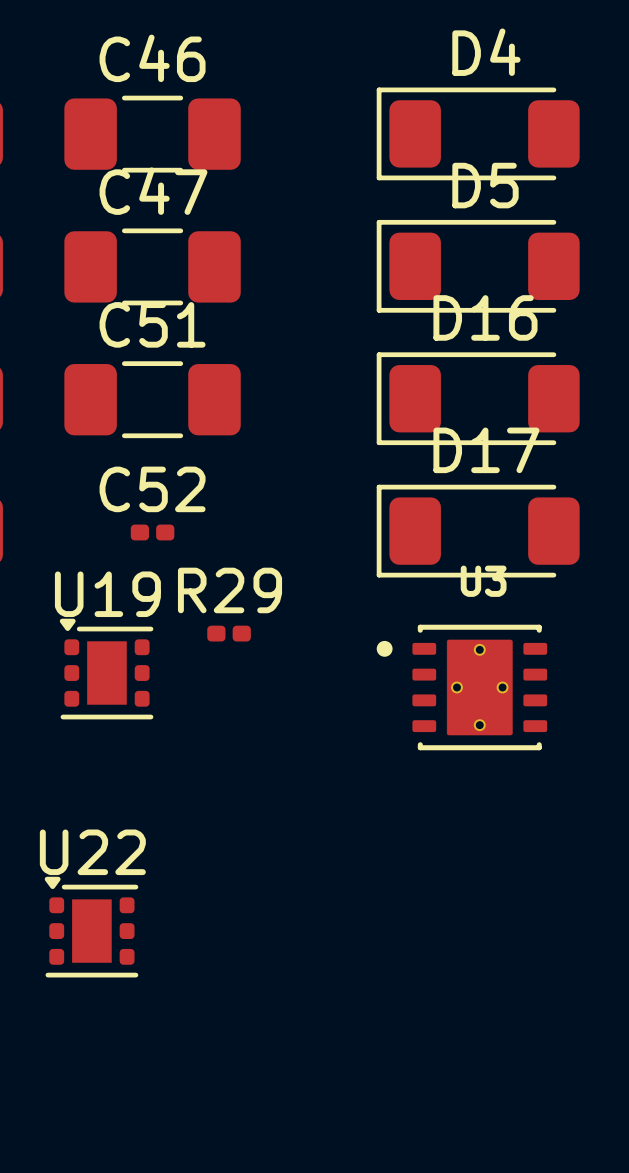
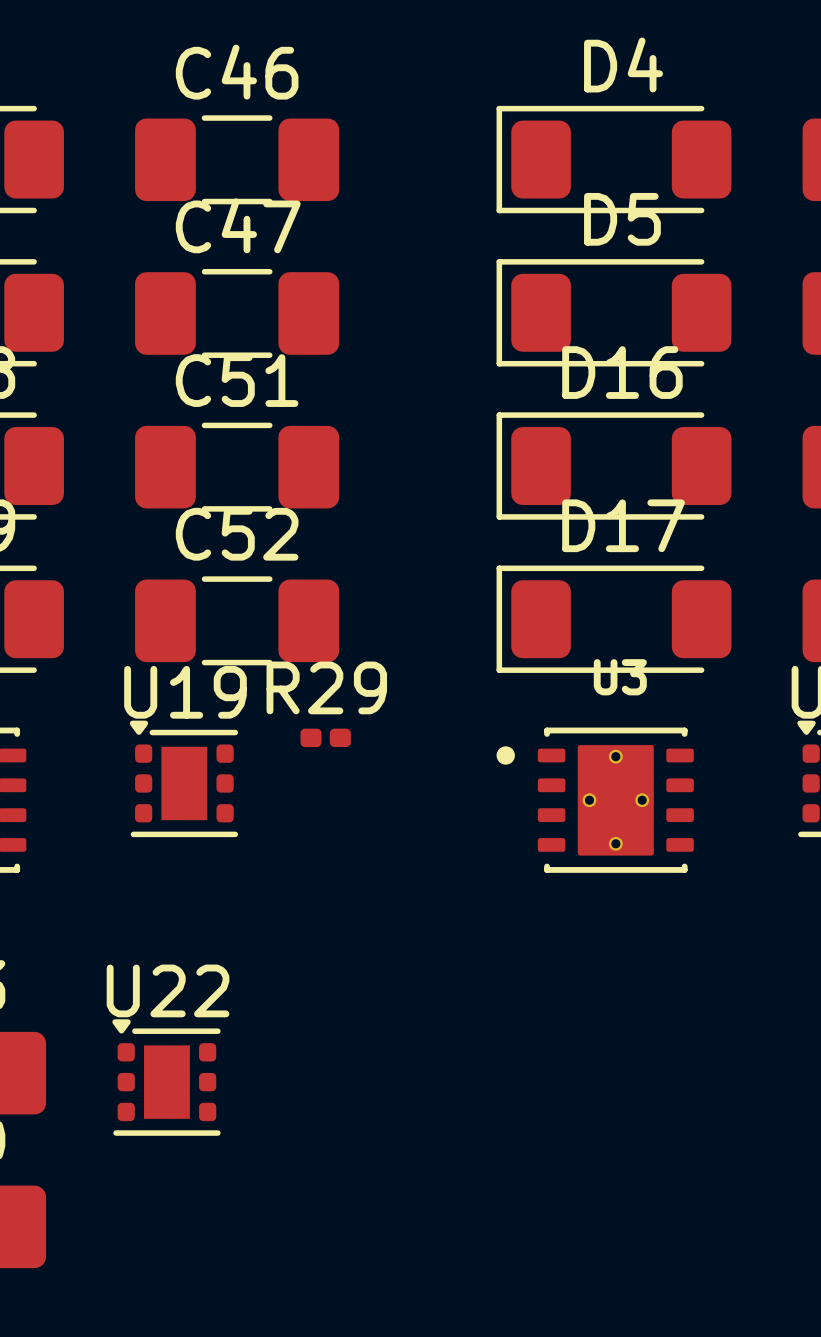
C52 footprint: [130, 524, 175, 541] -> [135, 576, 340, 666]

